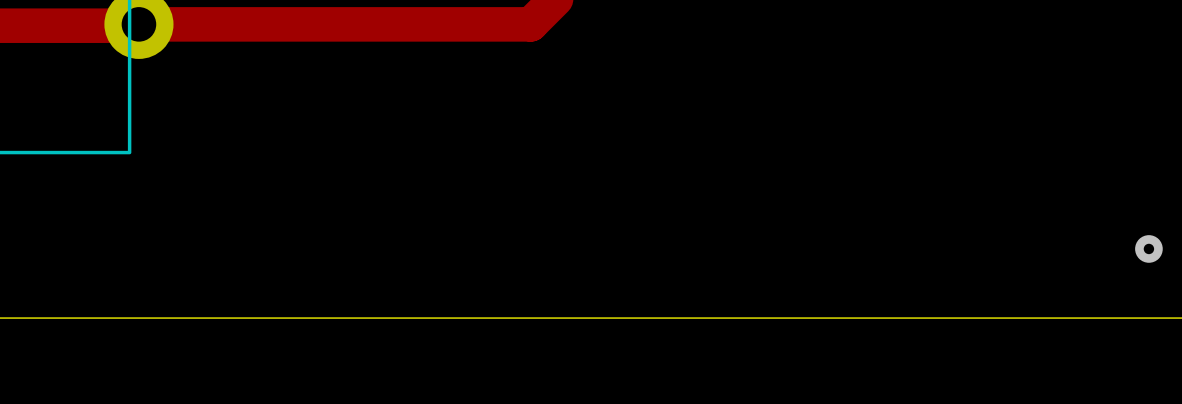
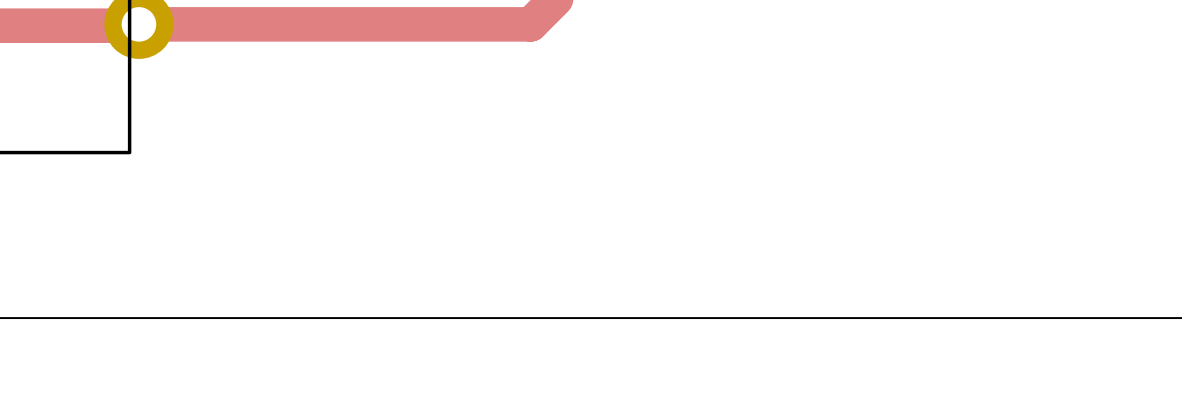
via: (1148, 248) -> none

